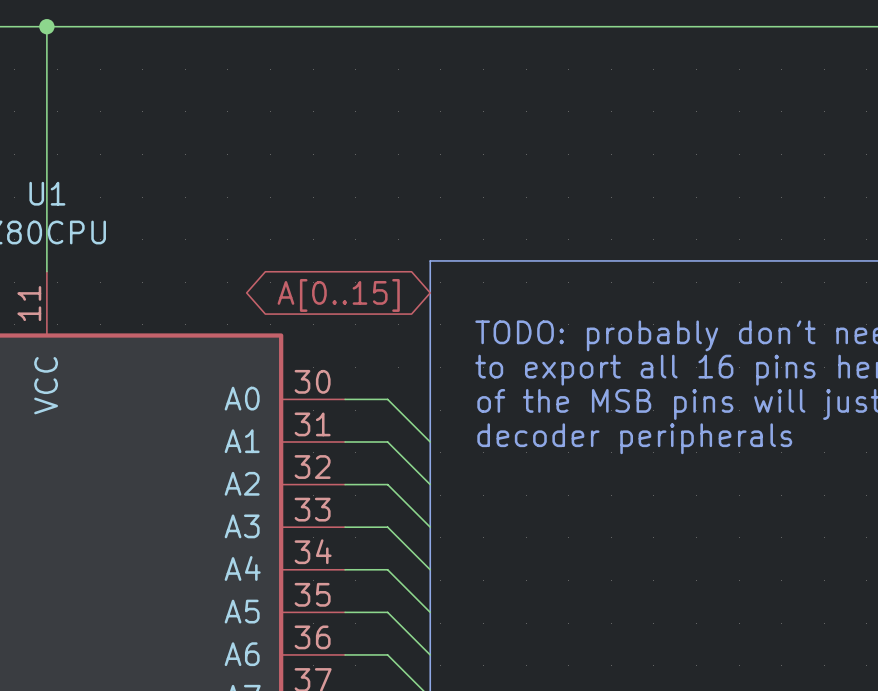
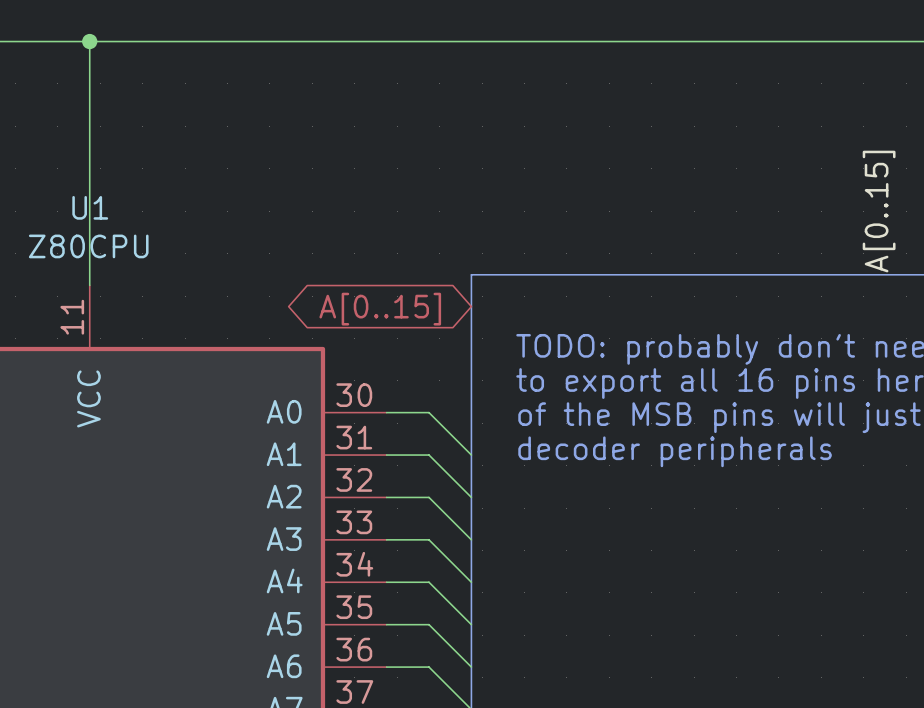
label: none -> A[0..15] (879, 211)

